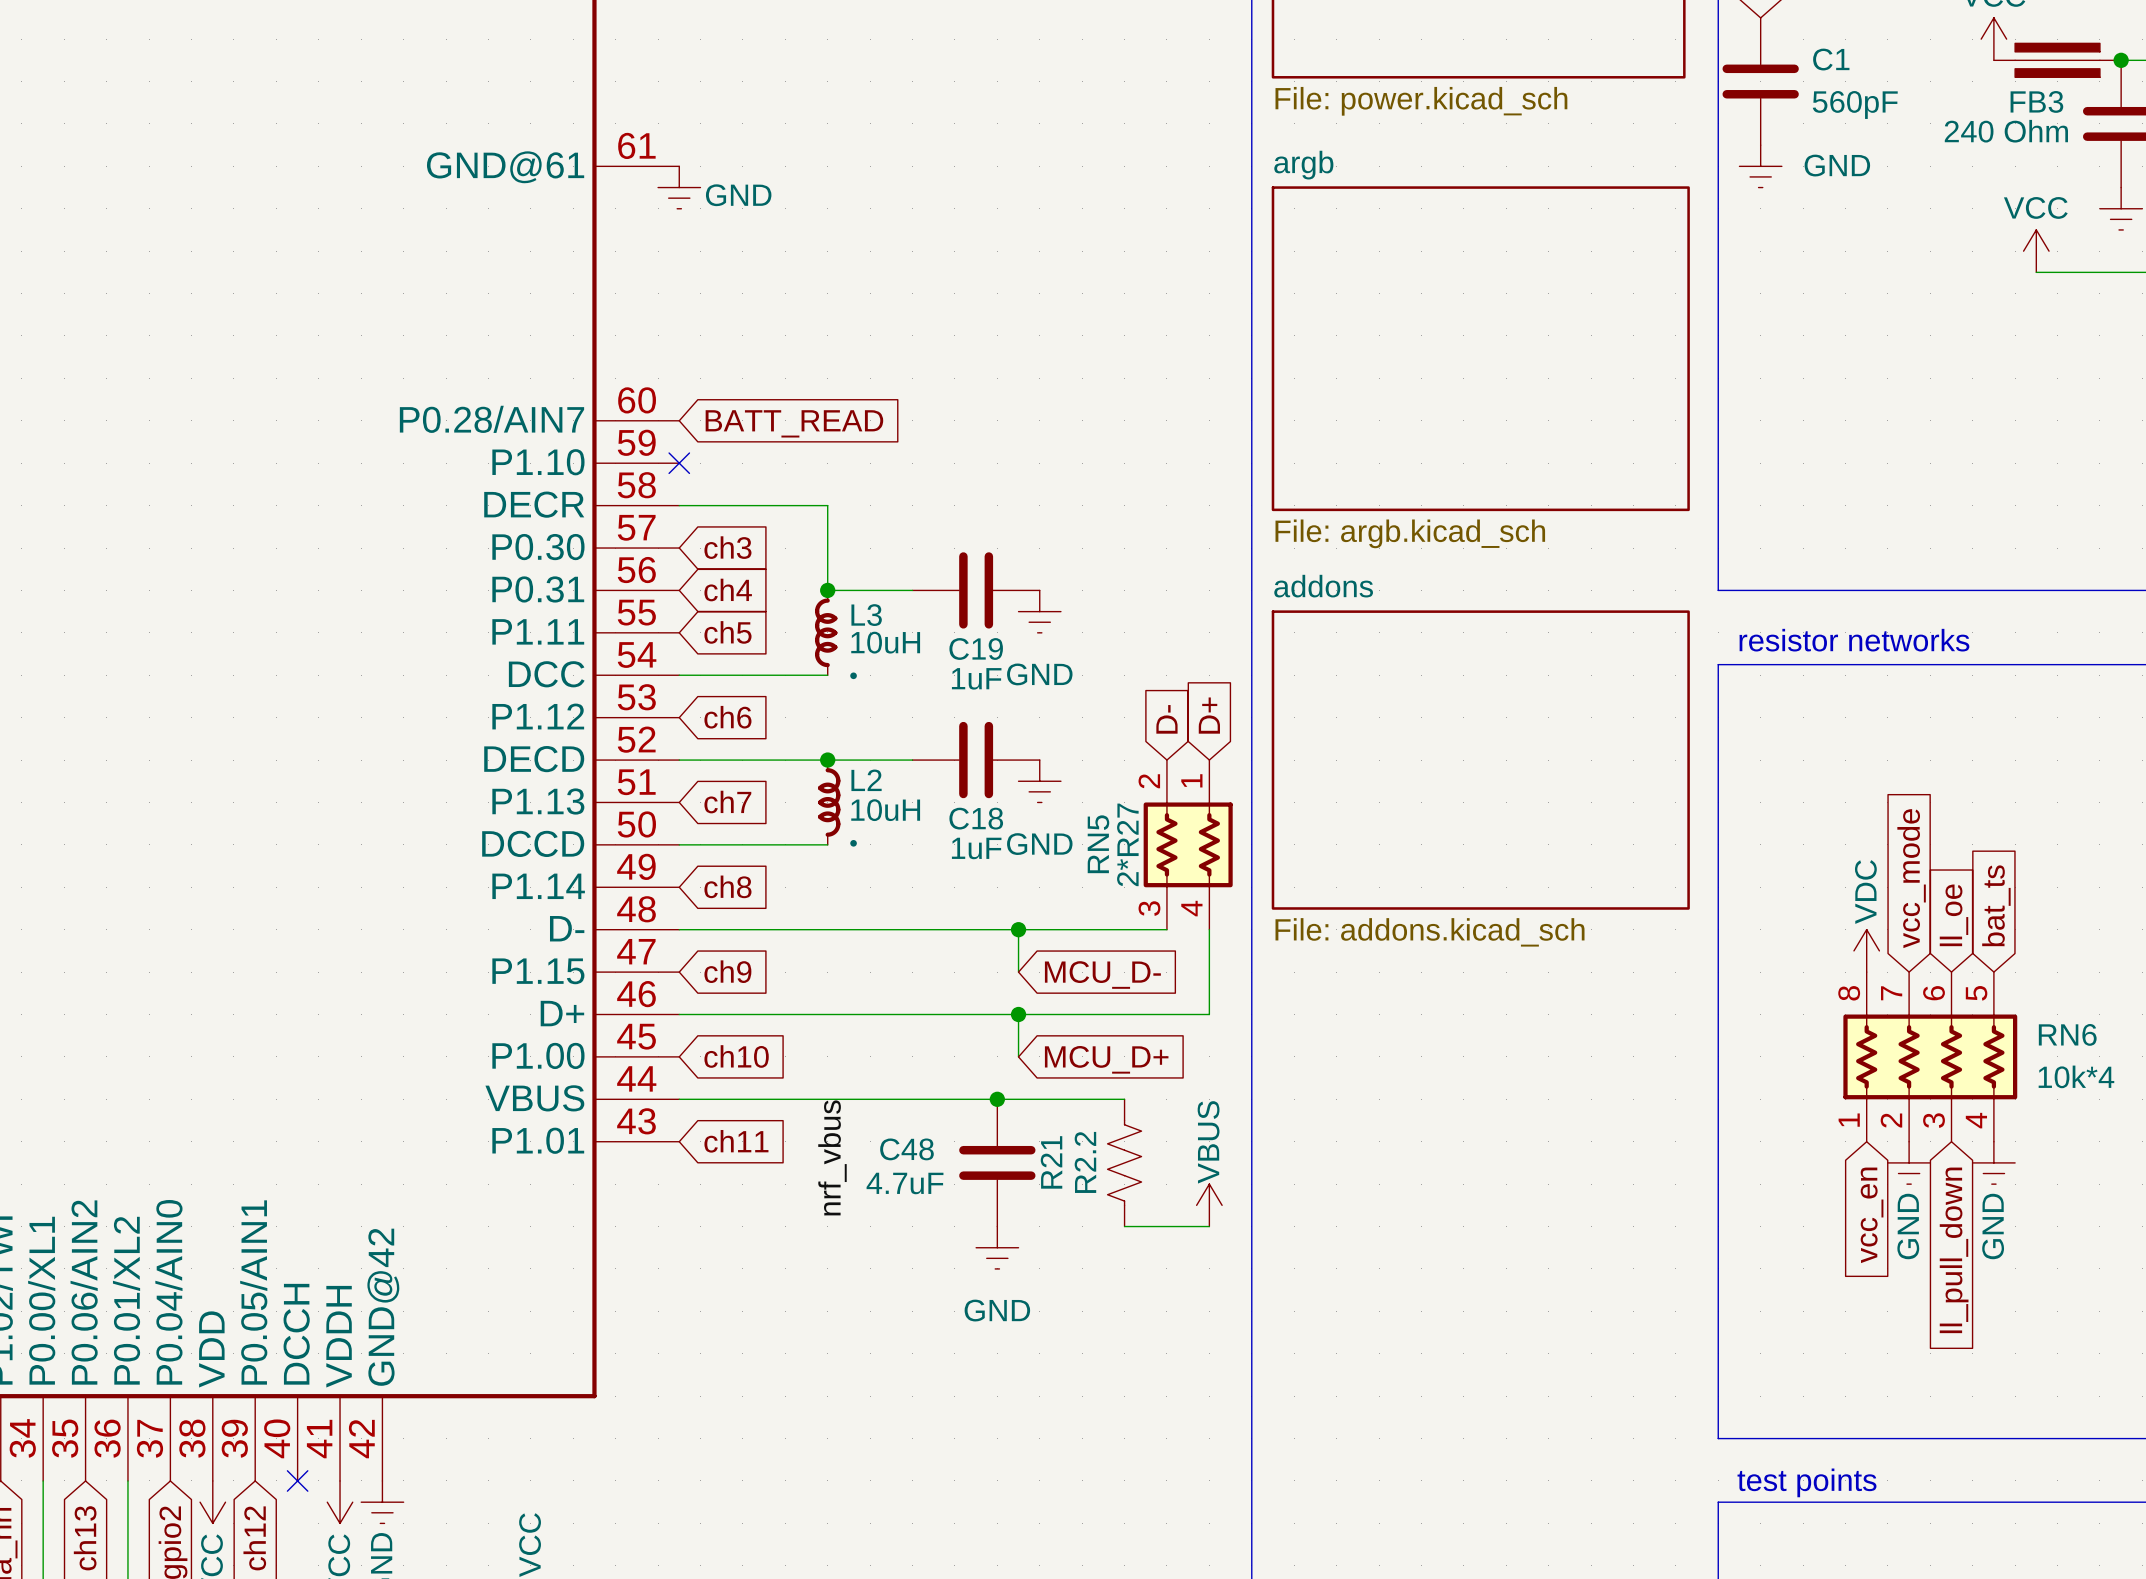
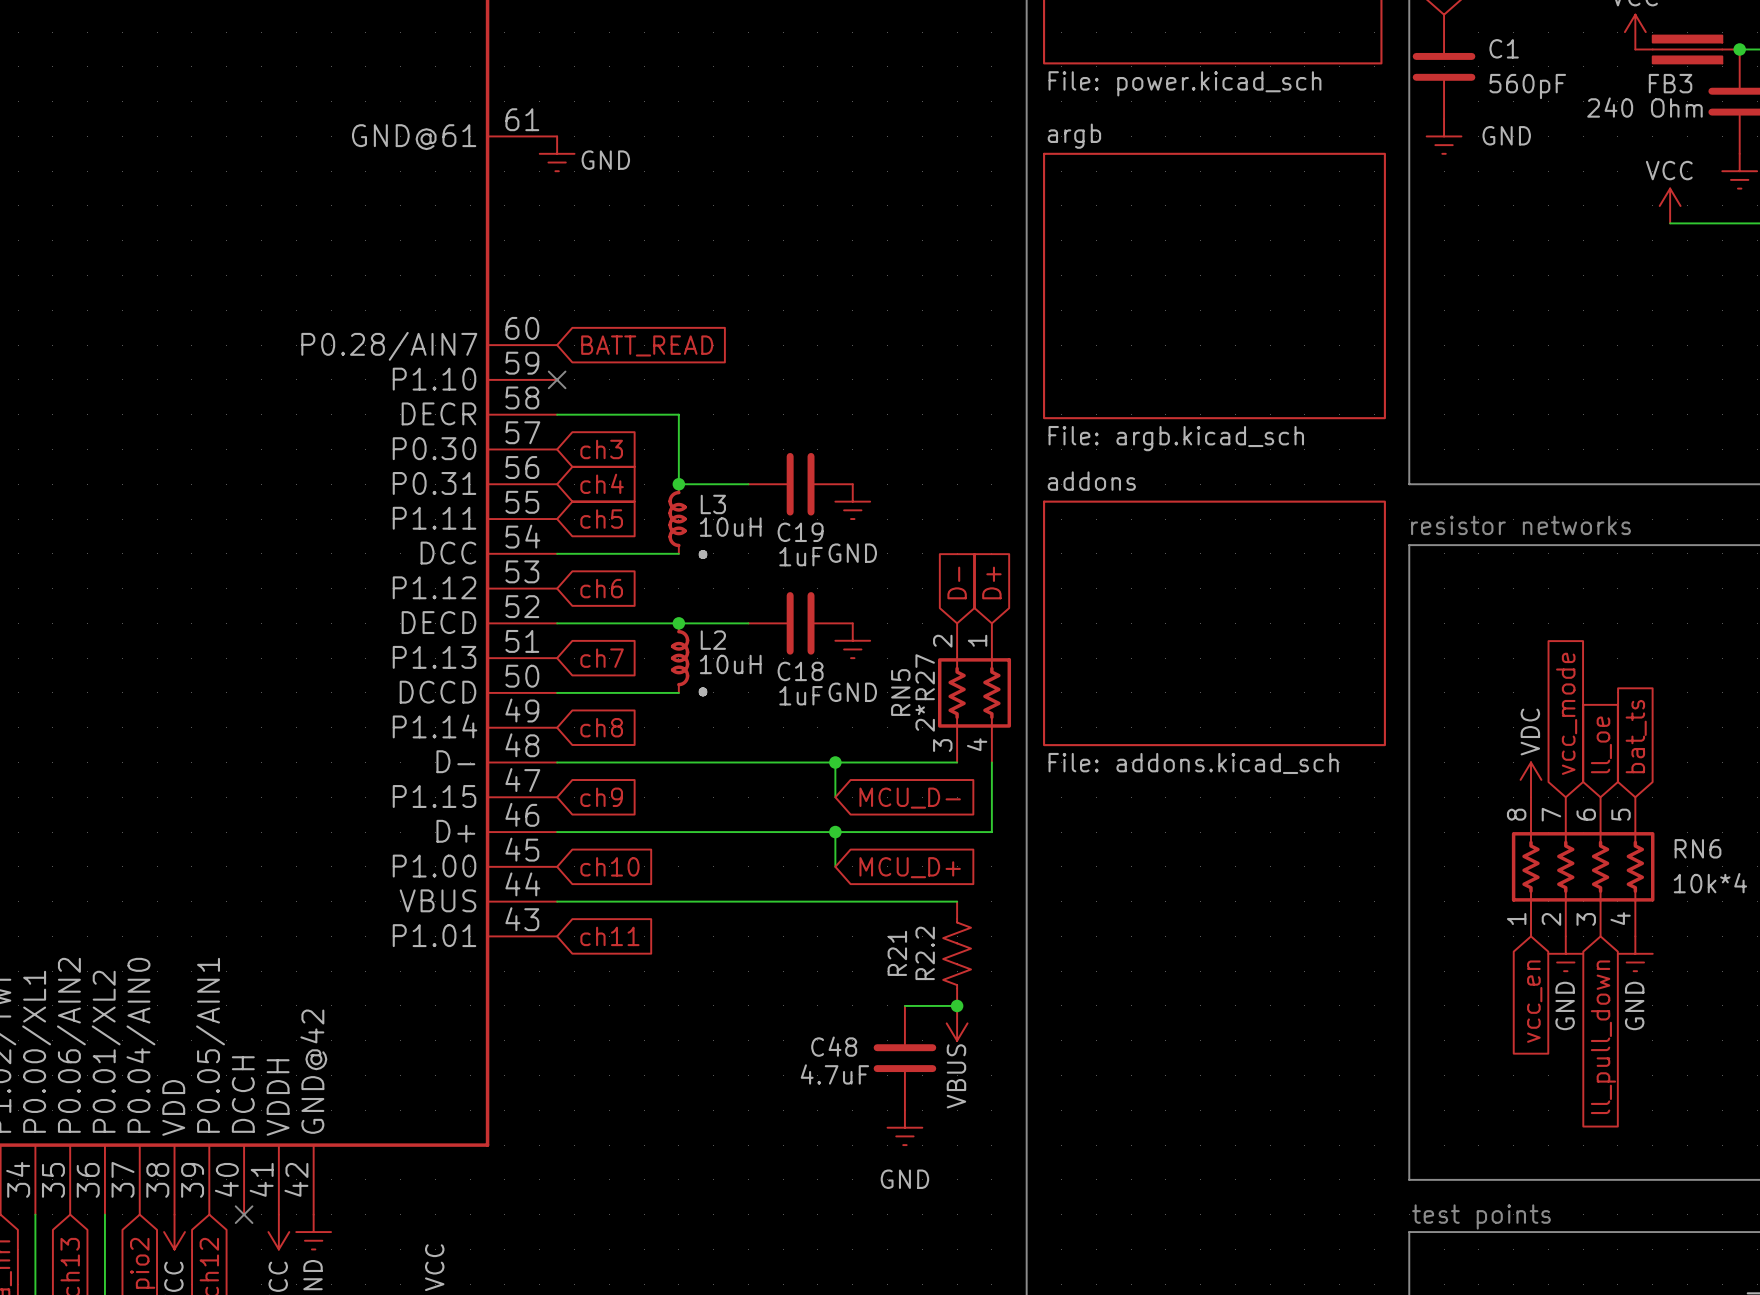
junction: (997, 1099) -> none
label: nrf_vbus (832, 1157) -> none
C48 position: (997, 1162) -> (904, 1058)
R21 position: (1124, 1162) -> (957, 953)
power symbol rotation: 0° (1209, 1205) -> 180° (957, 1023)
power symbol position: VBUS (1209, 1205) -> VBUS (957, 1023)
wire: none -> (904, 1005) (922, 1005)
wire: (1166, 1226) (1209, 1226) -> (922, 901) (957, 901)
junction: none -> (957, 1005)
power symbol position: GND (997, 1247) -> GND (904, 1127)

